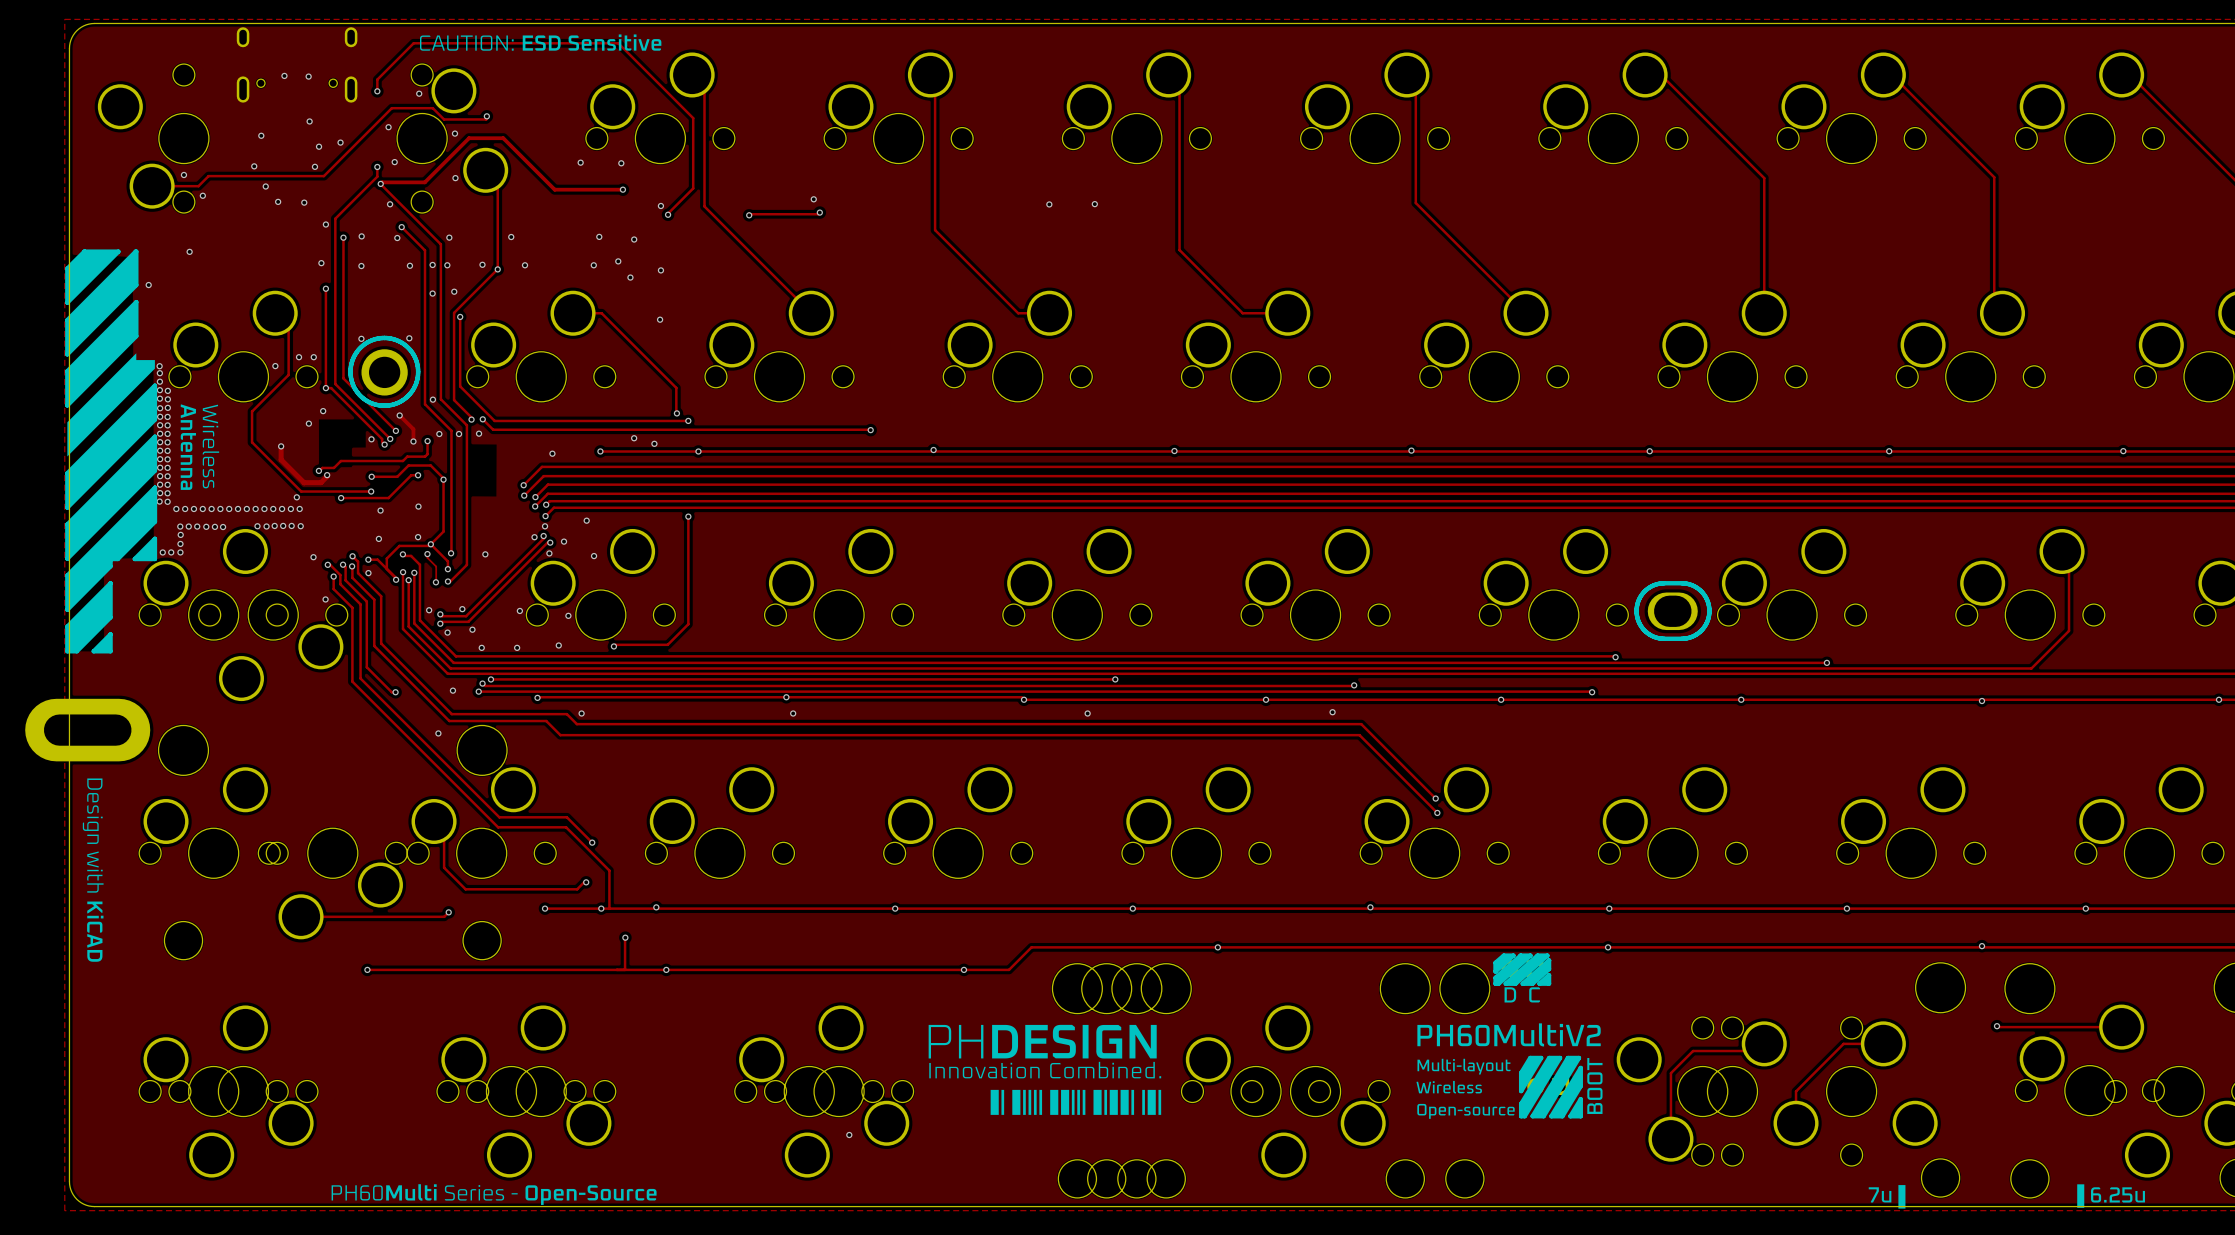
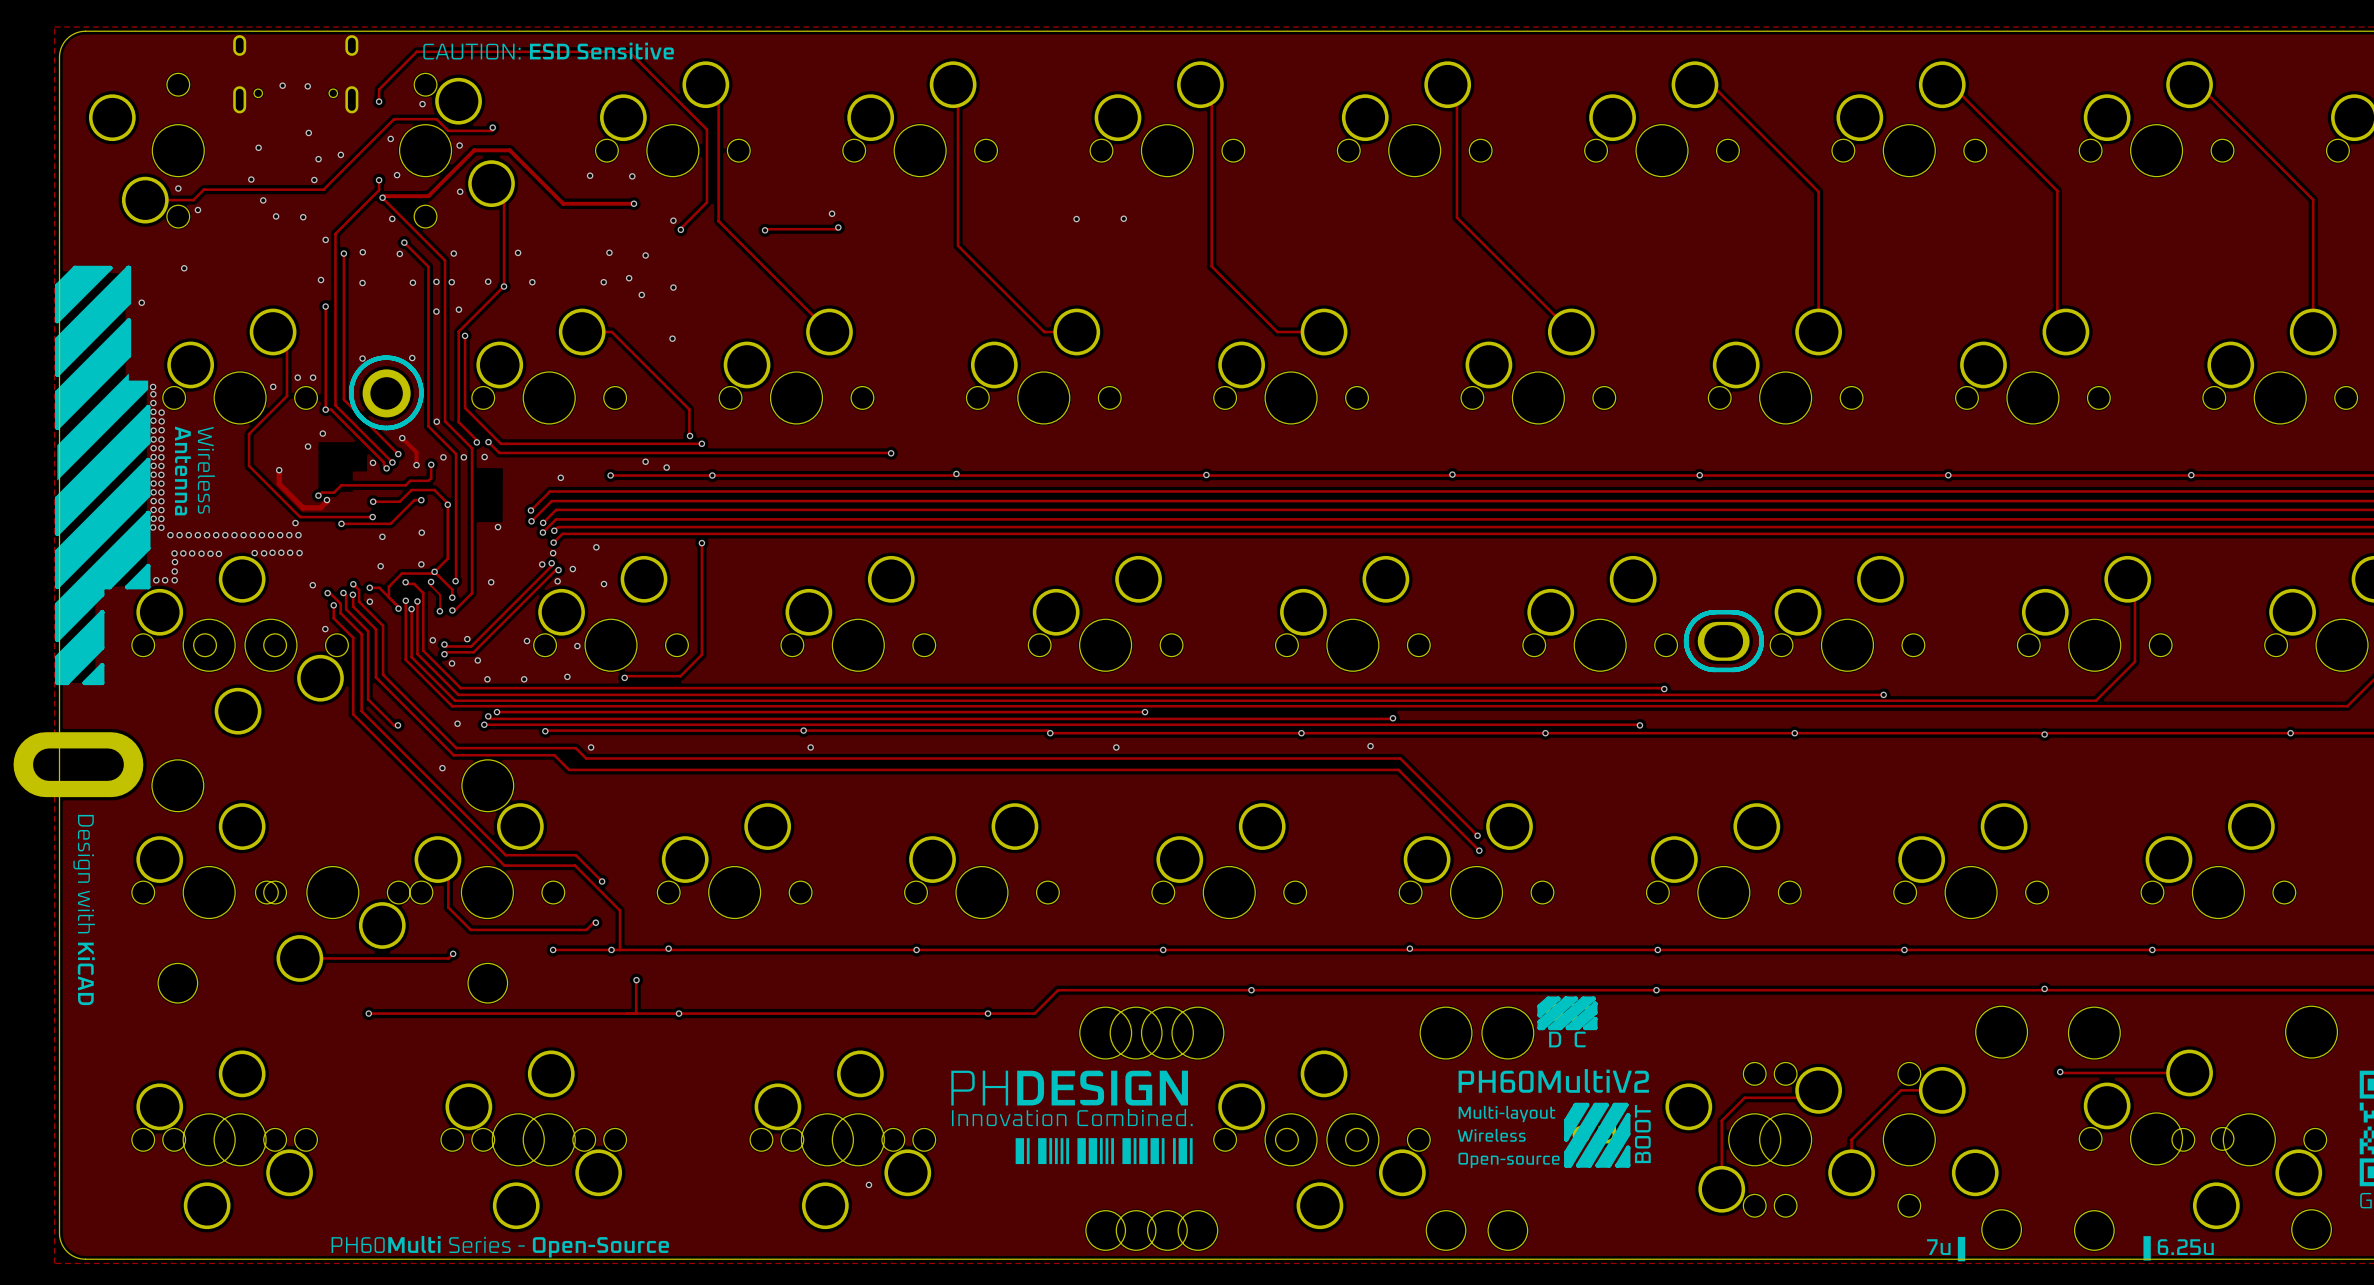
via: none -> (498, 527)

